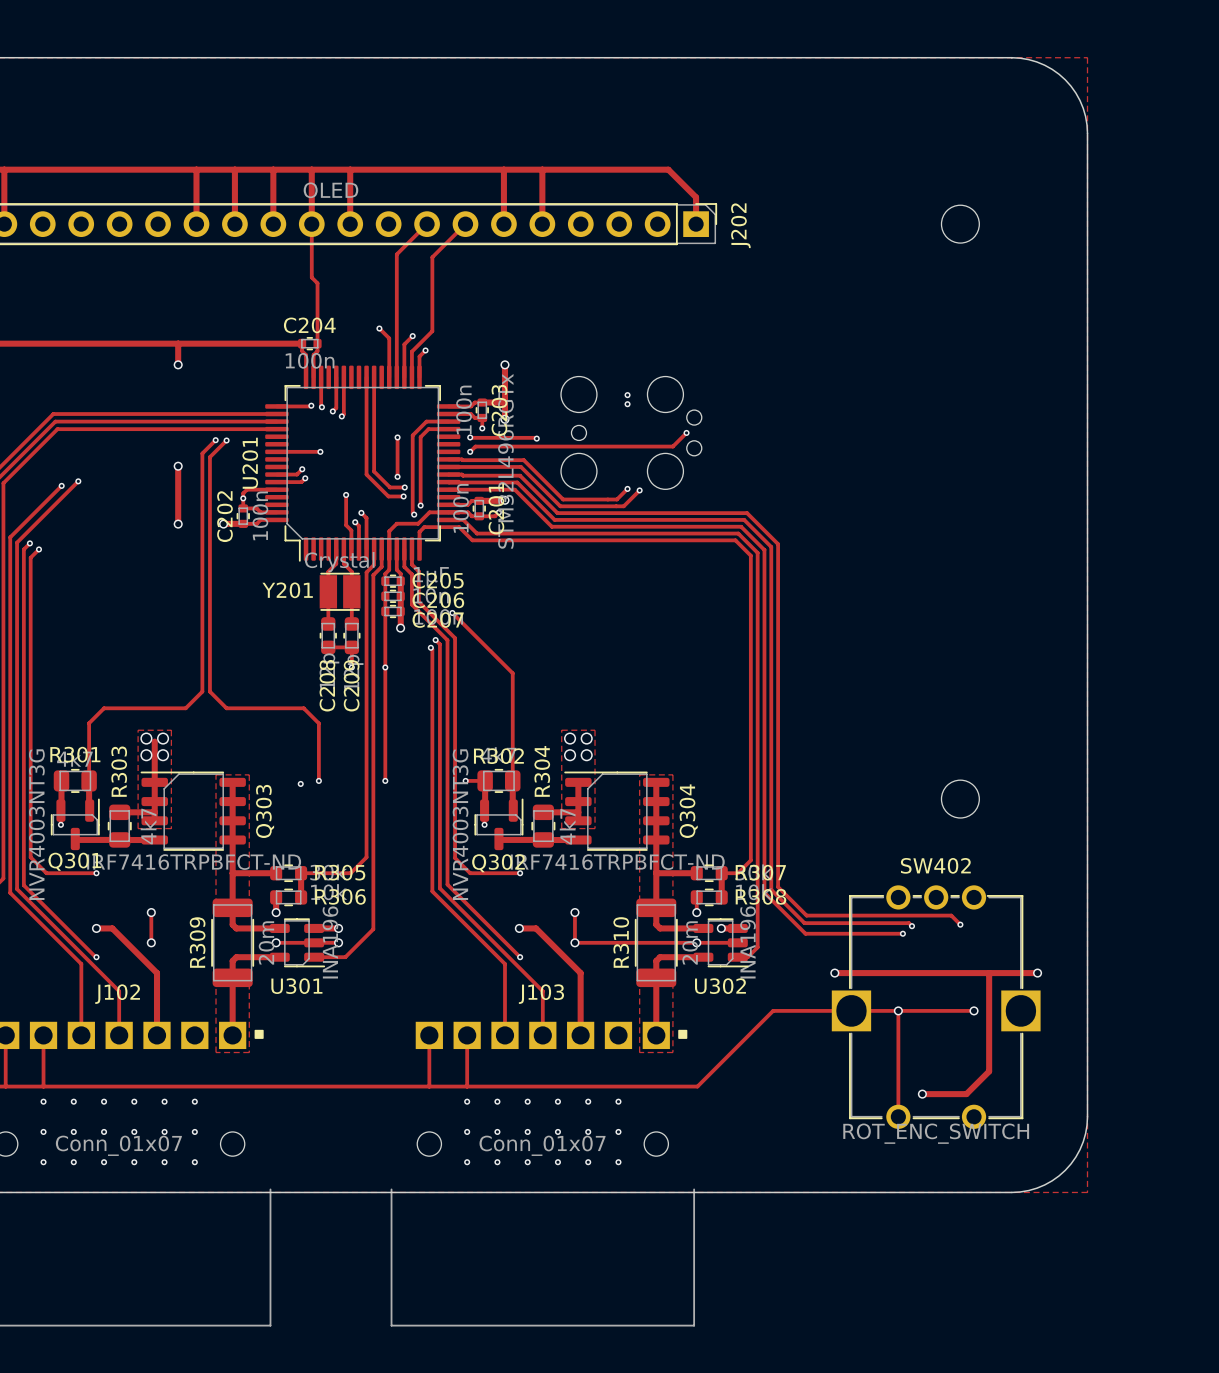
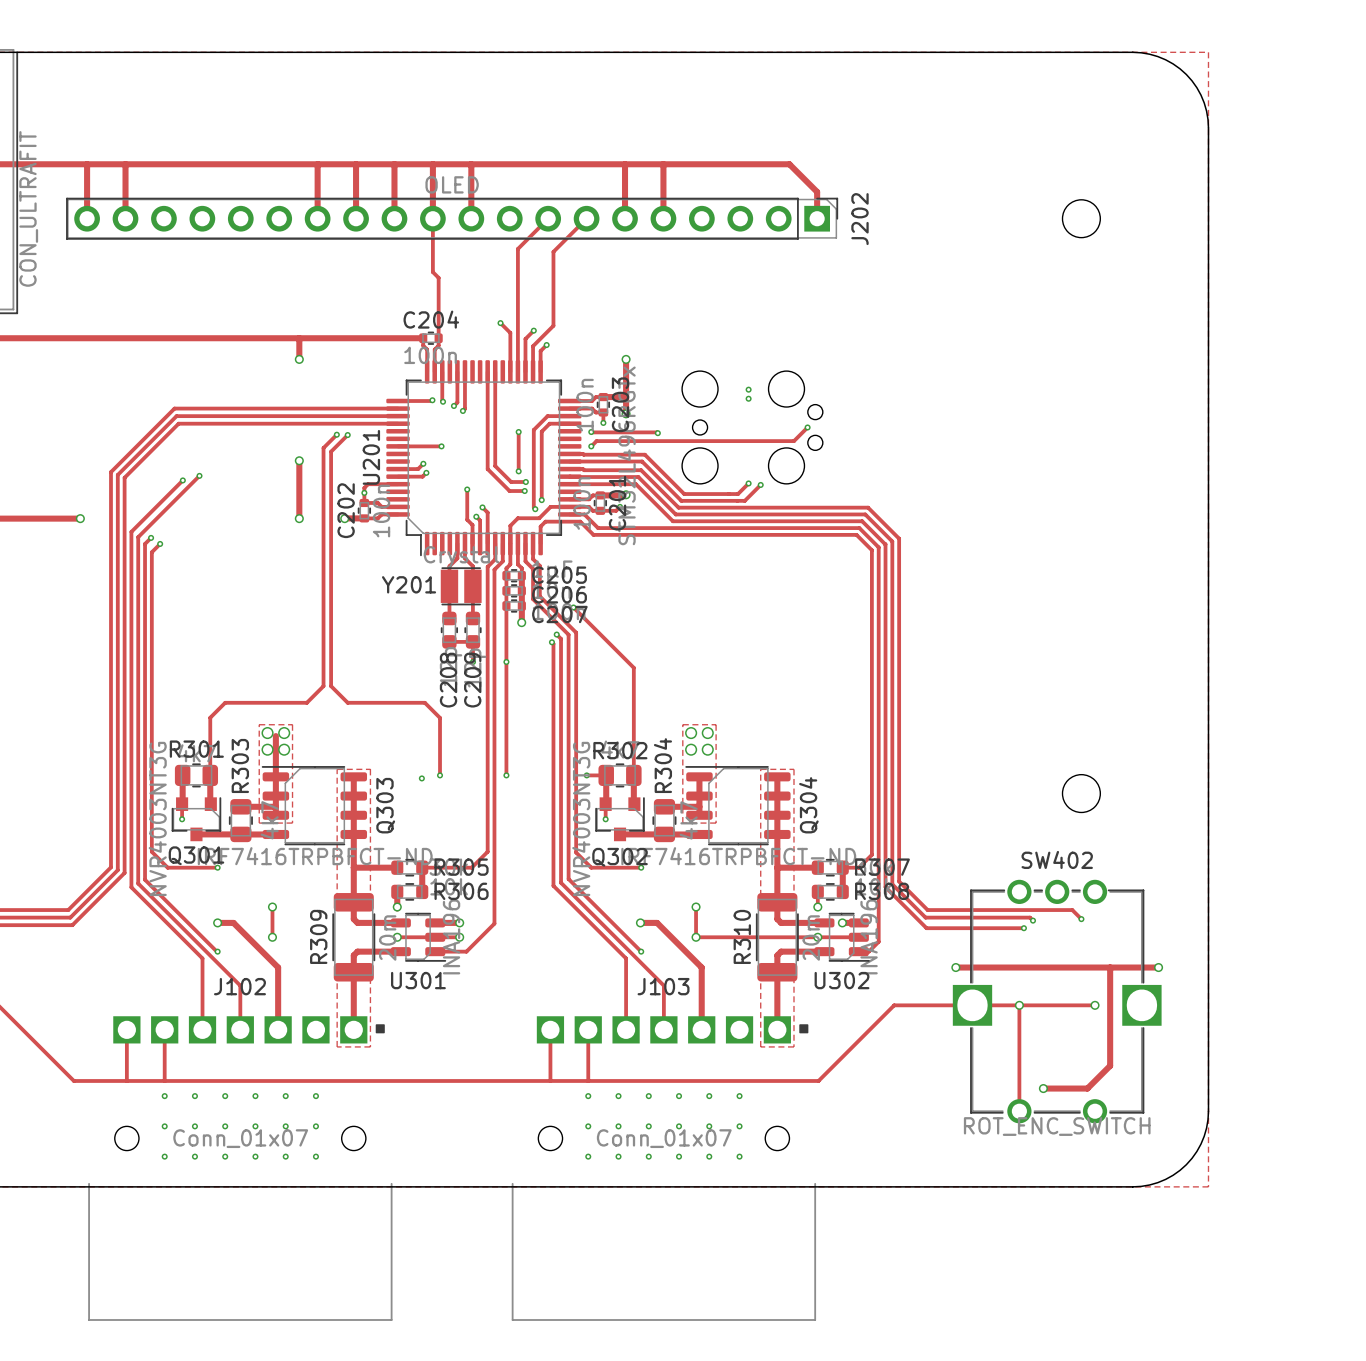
Q301 footprint: [50, 798, 100, 851] -> [171, 797, 222, 842]
Q302 footprint: [474, 798, 524, 851] -> [595, 797, 645, 842]

